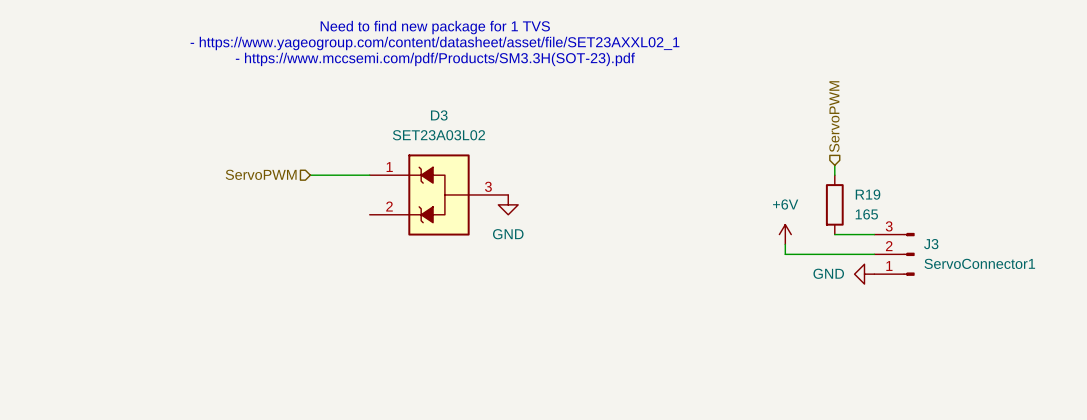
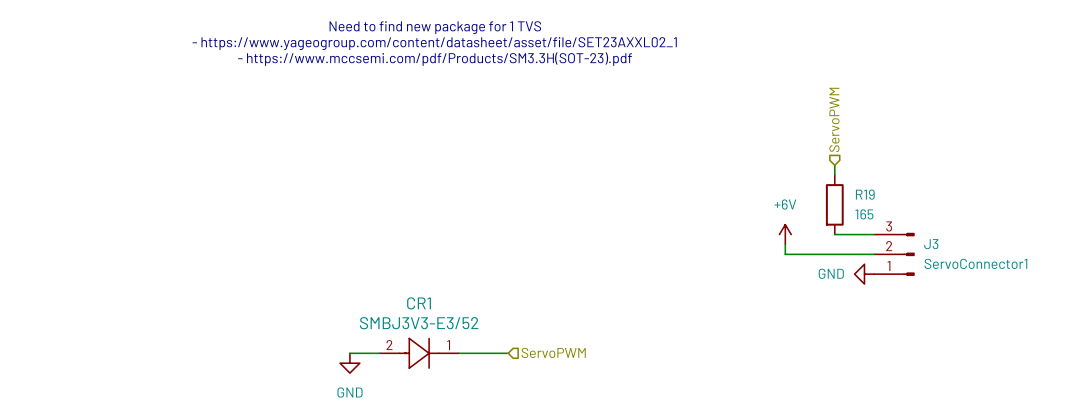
hierarchical label: ServoPWM (261, 174) -> none
wire: (310, 175) (369, 175) -> none
D3: SET23A03L02 (438, 194) -> none
power symbol: GND (508, 204) -> none
hierarchical label: none -> ServoPWM (553, 352)
wire: none -> (349, 353) (379, 353)
CR1: none -> SMBJ3V3-E3/52 (419, 353)
wire: none -> (458, 353) (508, 353)
power symbol: none -> GND (349, 363)

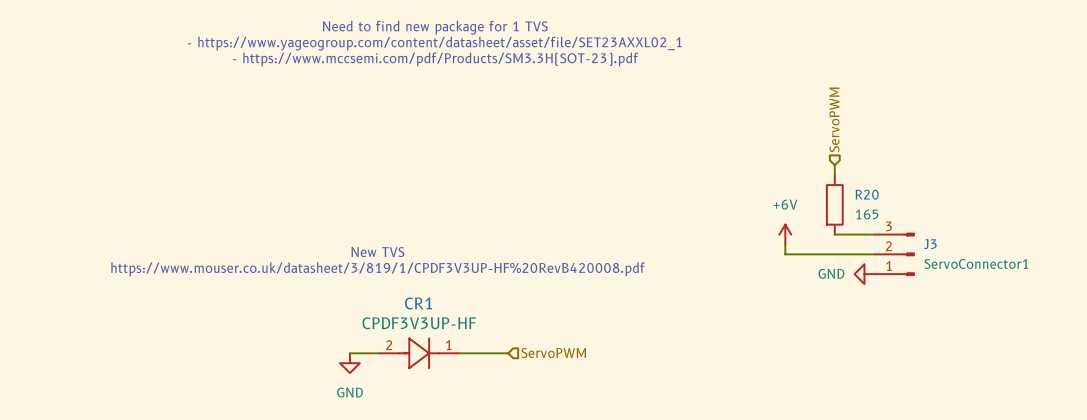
R19 name: R19 (865, 194) -> R20 (867, 194)
text: none -> New TVS (377, 252)
text: none -> https://www.mouser.co.uk/datasheet/3/819/1/CPDF3V3UP-HF%20RevB420008.pdf (378, 269)
CR1 value: SMBJ3V3-E3/52 (419, 323) -> CPDF3V3UP-HF (419, 323)

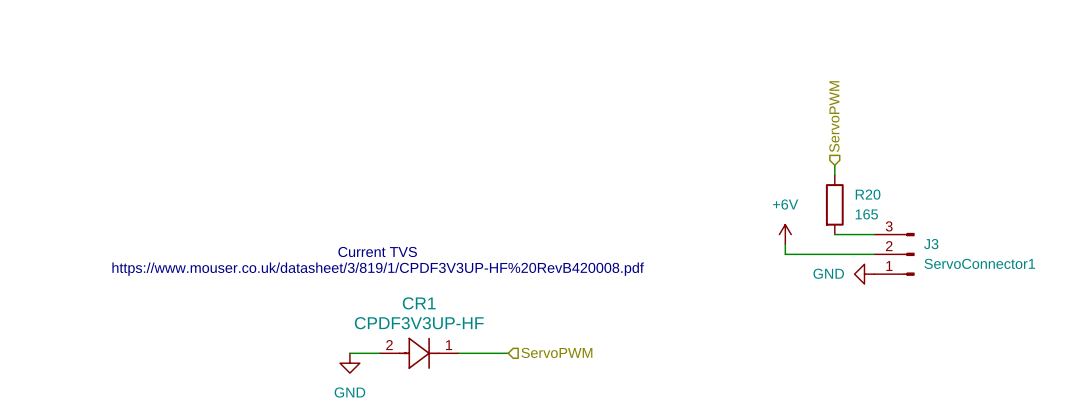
text: Need to find new package for 1 TVS (435, 27) -> none
text: - https://www.yageogroup.com/content/datasheet/asset/file/SET23AXXL02_1 (434, 43) -> none
text: - https://www.mccsemi.com/pdf/Products/SM3.3H(SOT-23).pdf (435, 59) -> none
text: New TVS (377, 252) -> Current TVS (377, 251)

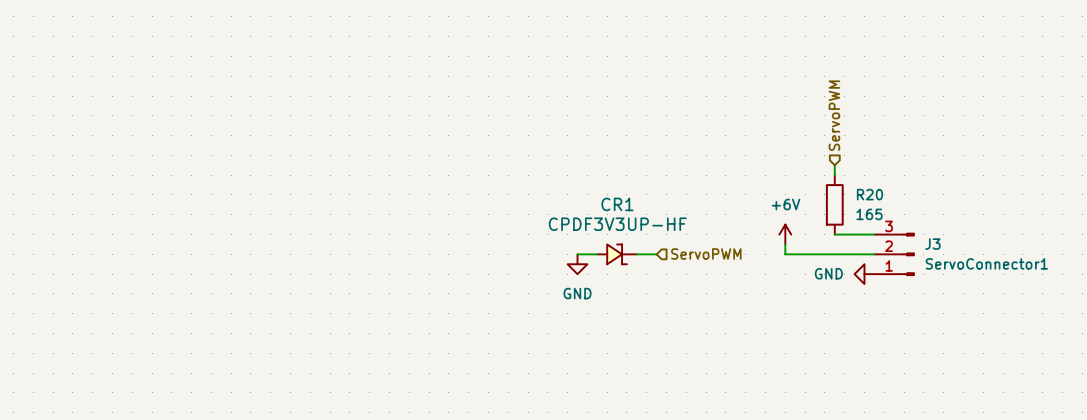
text: Current TVS (377, 251) -> none
wire: none -> (577, 254) (597, 254)
wire: none -> (636, 254) (656, 254)
power symbol: none -> GND (577, 264)
text: https://www.mouser.co.uk/datasheet/3/819/1/CPDF3V3UP-HF%20RevB420008.pdf (378, 269) -> none
CR1 symbol: [379, 337, 459, 369] -> [597, 243, 637, 266]
hierarchical label position: ServoPWM (556, 352) -> ServoPWM (706, 253)
wire: (349, 353) (379, 353) -> none
wire: (458, 353) (508, 353) -> none
power symbol: GND (349, 363) -> none

